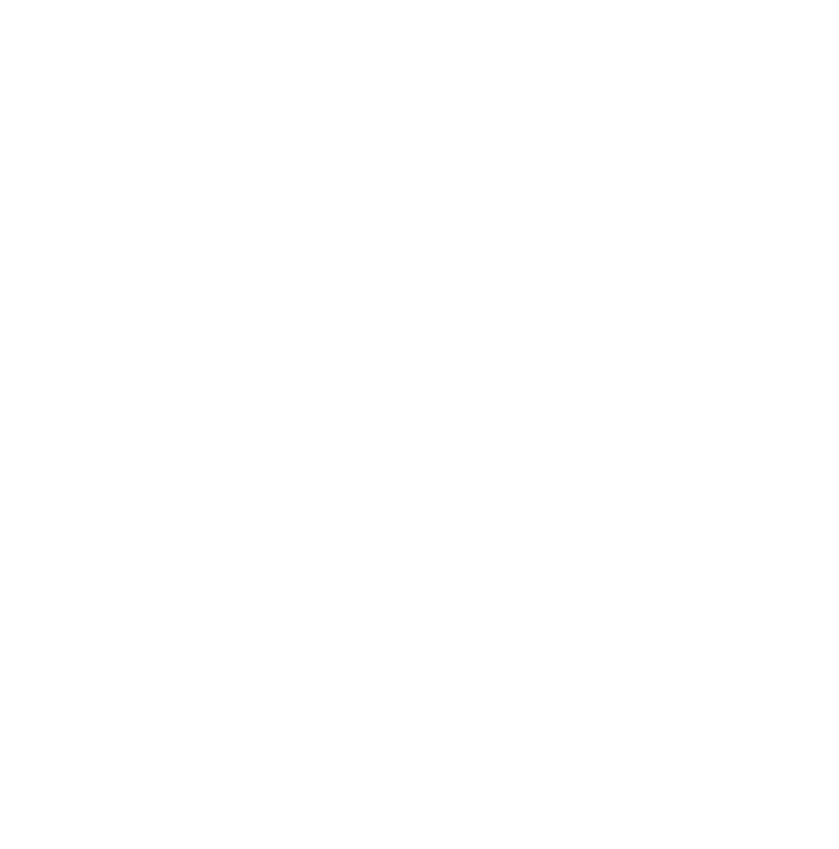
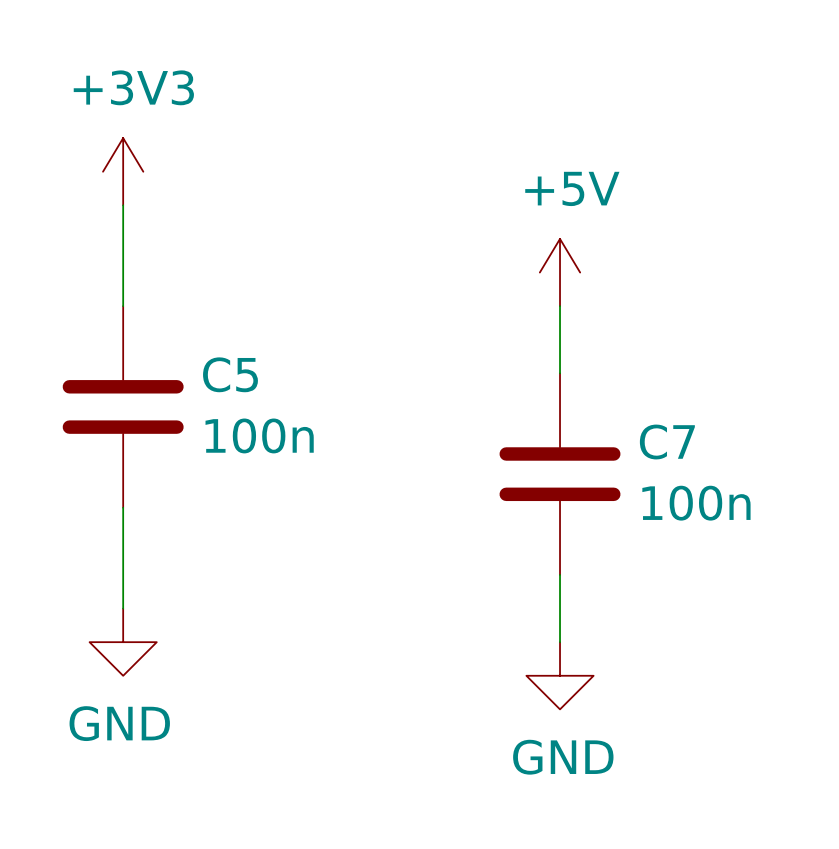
power symbol: none -> +3V3 (123, 171)
wire: none -> (123, 205) (123, 306)
power symbol: none -> +5V (560, 272)
wire: none -> (560, 306) (560, 373)
C5: none -> 100n (123, 406)
C7: none -> 100n (560, 474)
wire: none -> (123, 507) (123, 608)
wire: none -> (560, 574) (560, 642)
power symbol: none -> GND (123, 642)
power symbol: none -> GND (560, 675)

